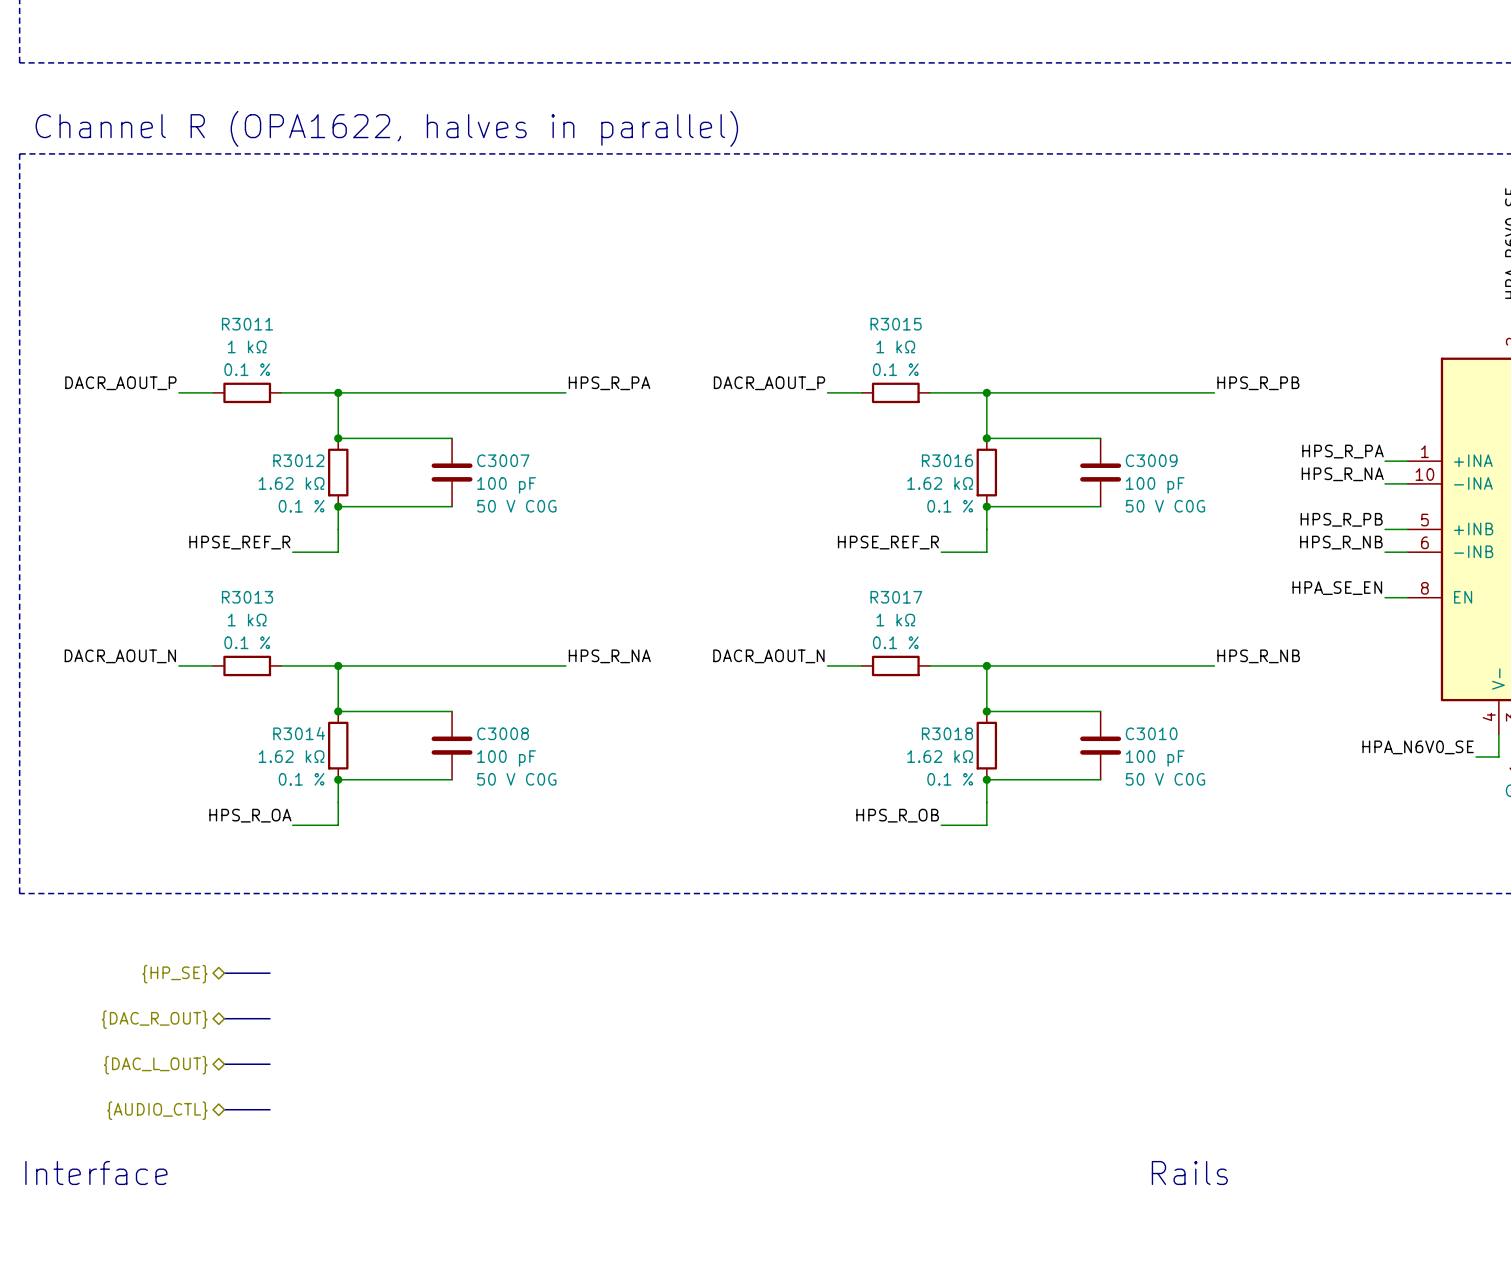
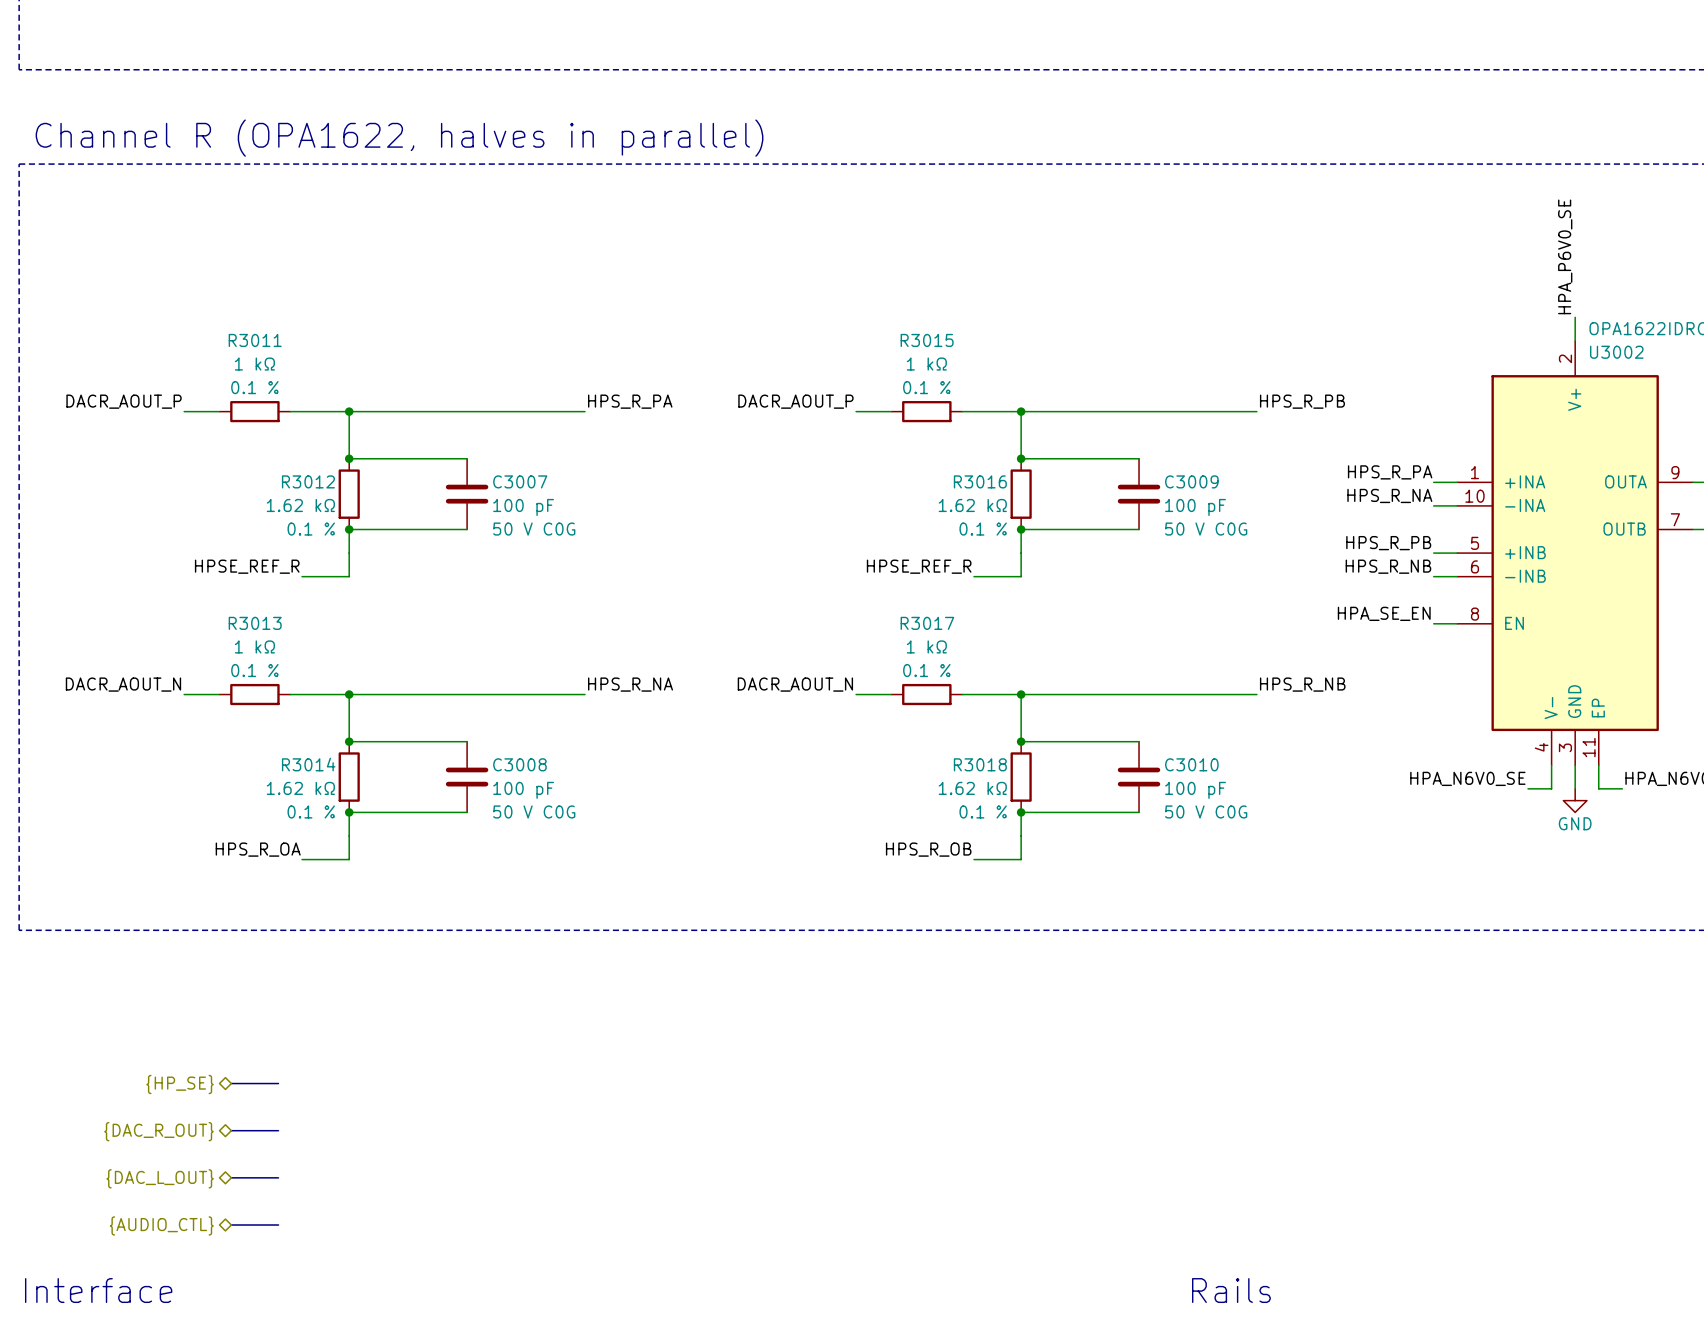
bus: (224, 973) (269, 973) -> (231, 1083) (278, 1083)
hierarchical label position: {HP_SE} (174, 974) -> {HP_SE} (180, 1084)
bus: (224, 1018) (269, 1018) -> (231, 1130) (278, 1130)
hierarchical label position: {DAC_R_OUT} (154, 1019) -> {DAC_R_OUT} (159, 1131)
bus: (224, 1064) (269, 1064) -> (231, 1177) (278, 1177)
hierarchical label position: {DAC_L_OUT} (155, 1065) -> {DAC_L_OUT} (160, 1178)
bus: (224, 1109) (269, 1109) -> (231, 1225) (278, 1225)
hierarchical label position: {AUDIO_CTL} (157, 1110) -> {AUDIO_CTL} (161, 1225)
text position: Interface (96, 1172) -> Interface (98, 1290)
text position: Rails (1189, 1172) -> Rails (1231, 1290)

